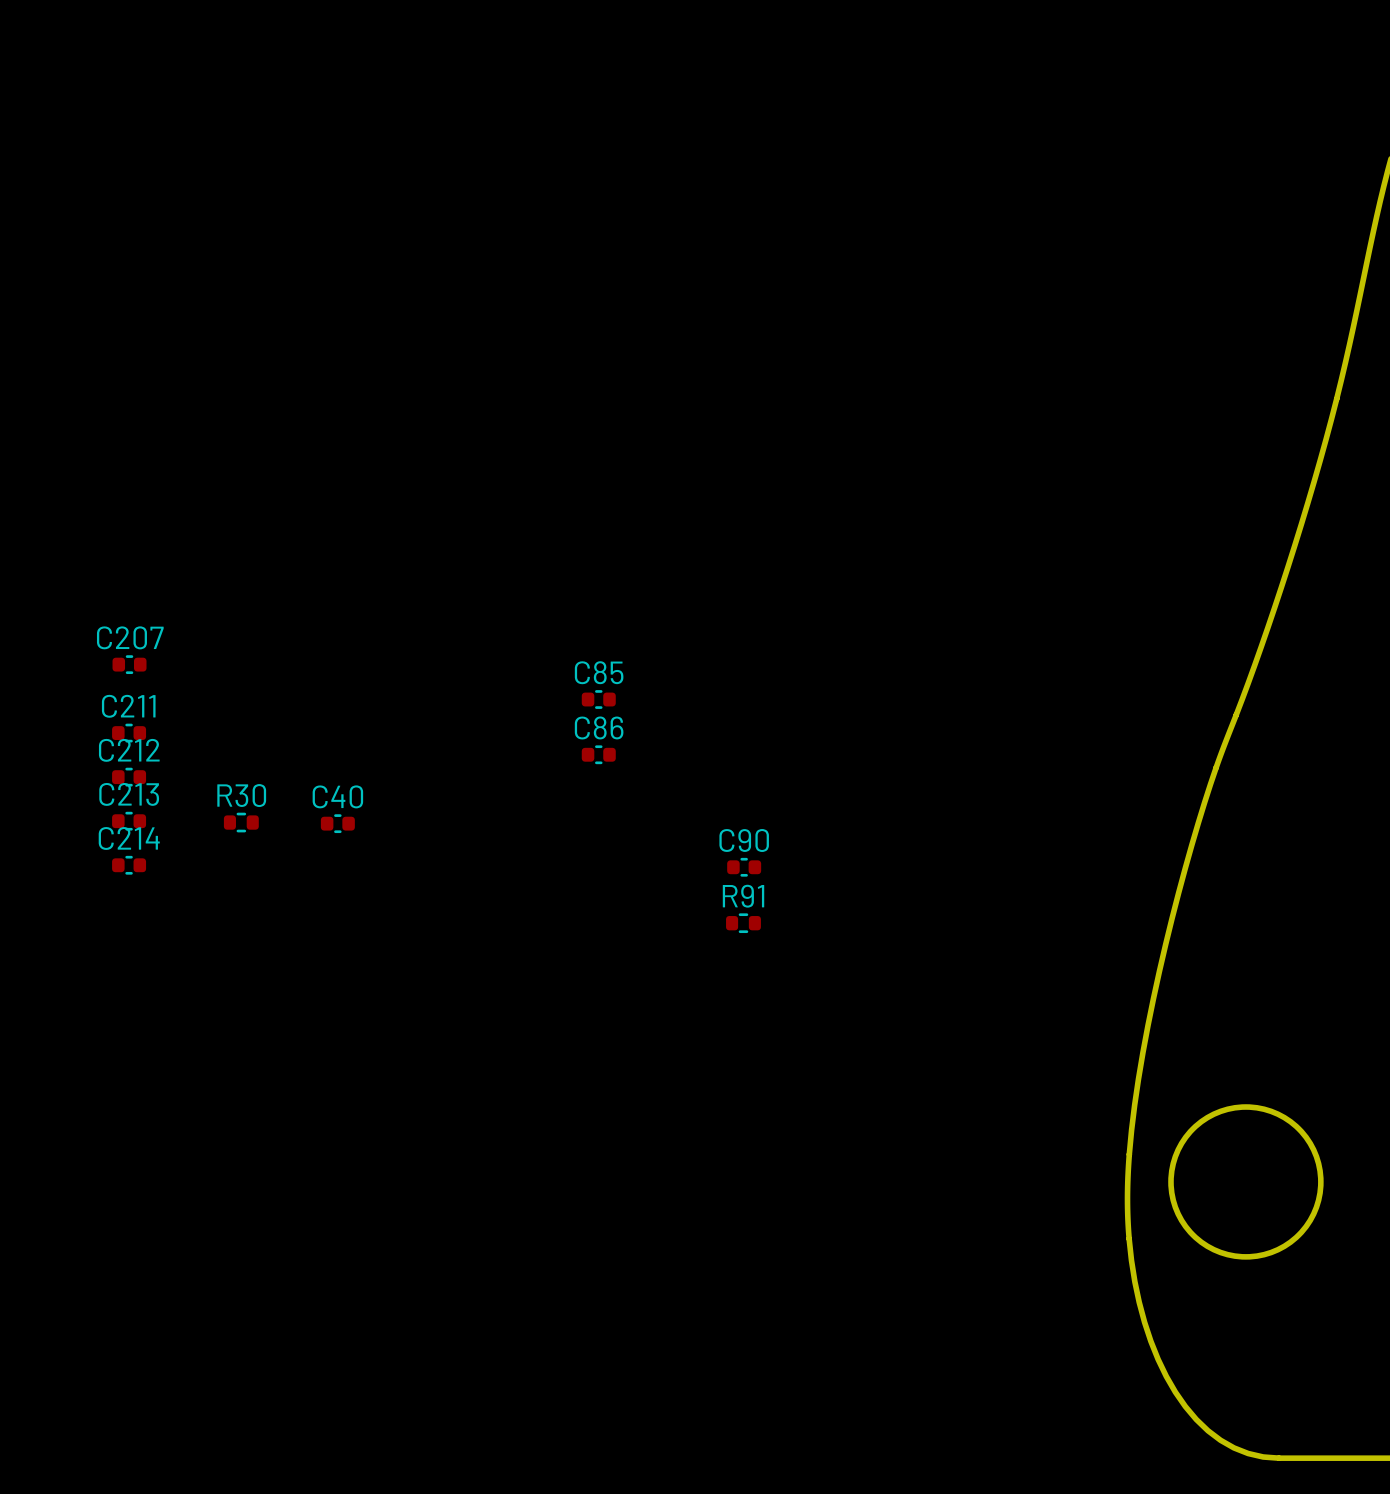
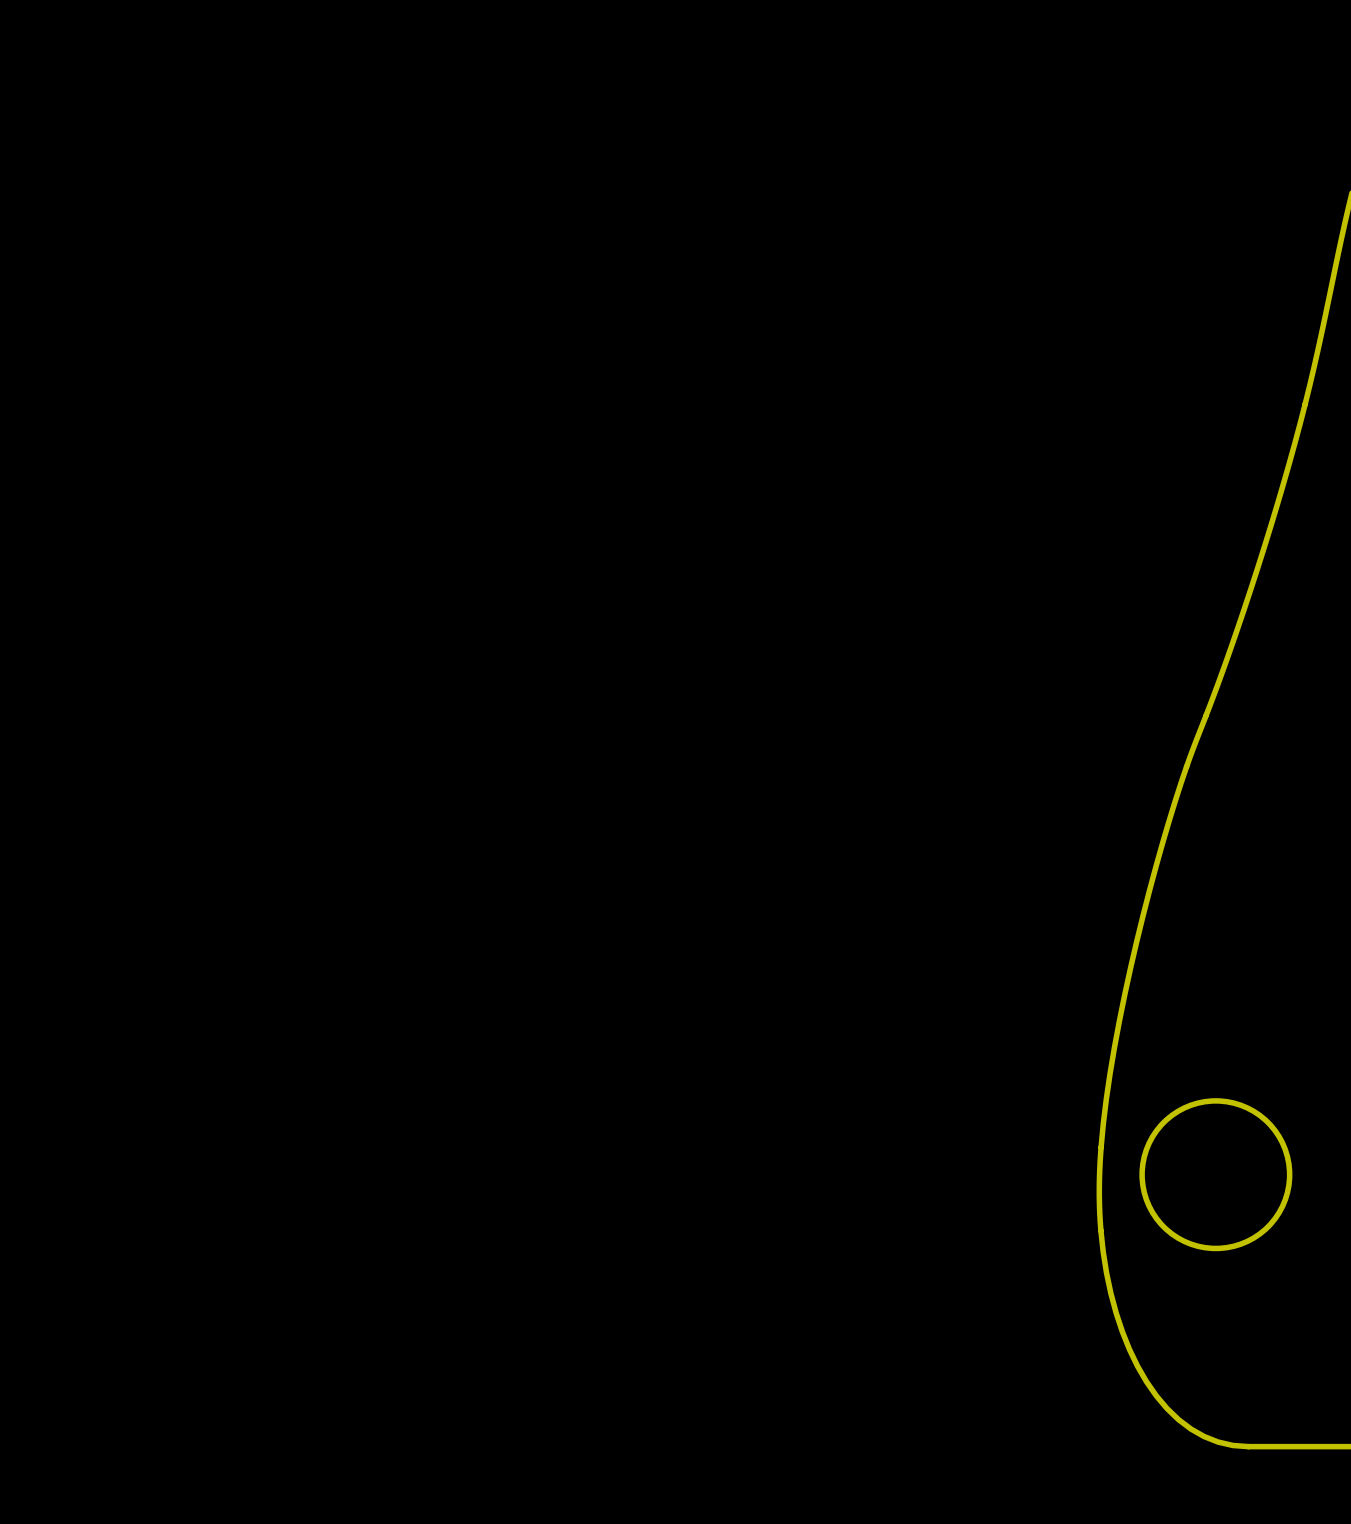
C207: (129, 664) -> none
C85: (598, 699) -> none
C211: (129, 733) -> none
C86: (598, 754) -> none
C212: (129, 777) -> none
C213: (129, 821) -> none
R30: (241, 822) -> none
C40: (337, 823) -> none
C214: (129, 865) -> none
C90: (744, 867) -> none
R91: (743, 923) -> none

